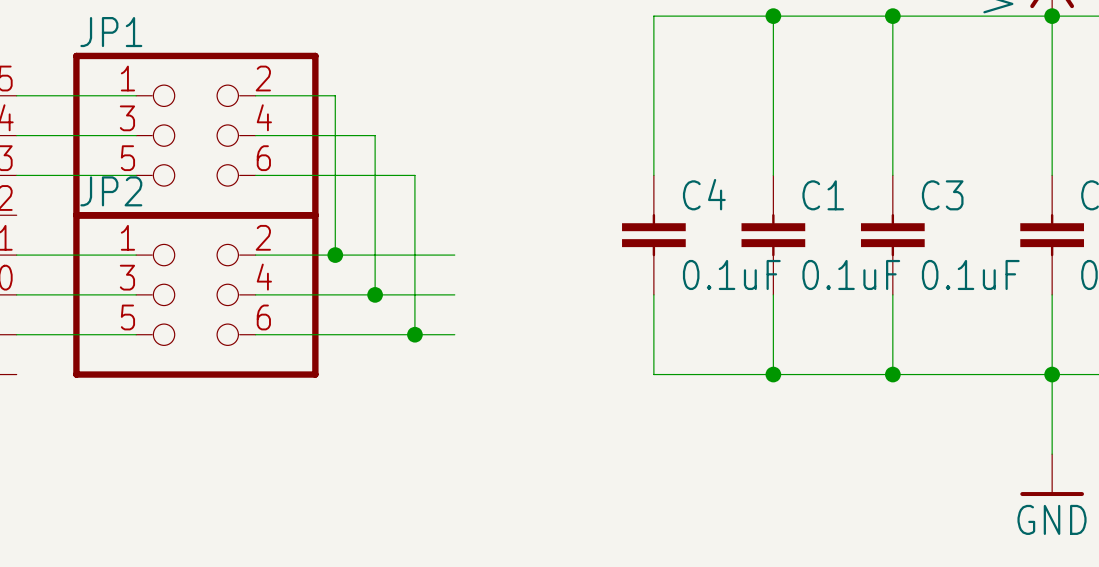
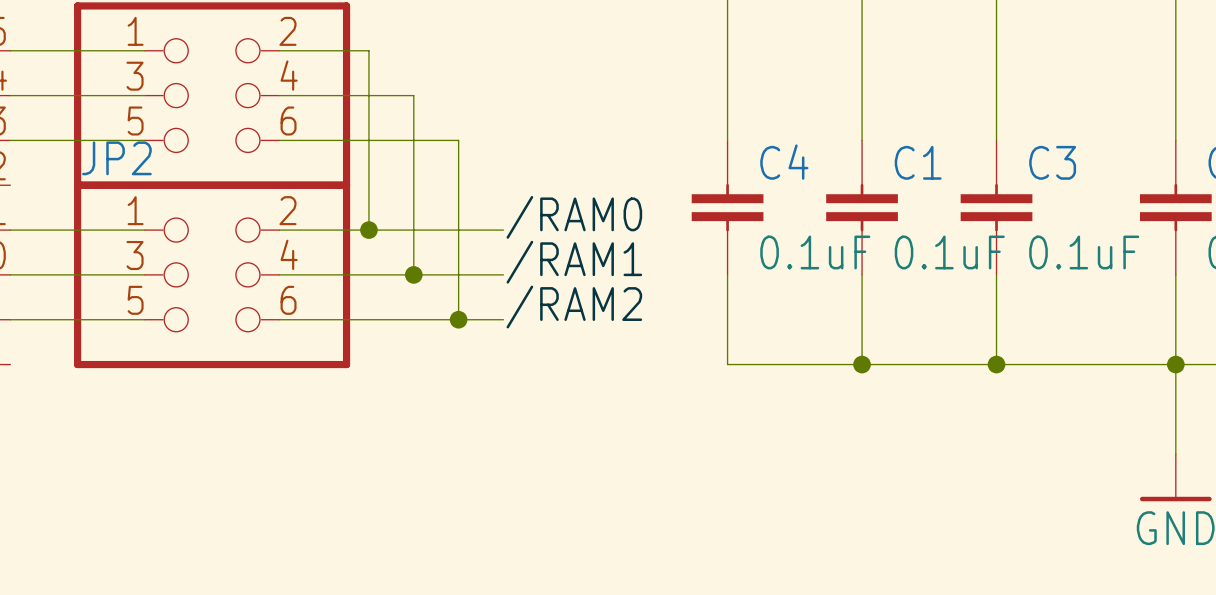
label: none -> /RAM0 (574, 217)
label: none -> /RAM1 (574, 262)
label: none -> /RAM2 (574, 307)

